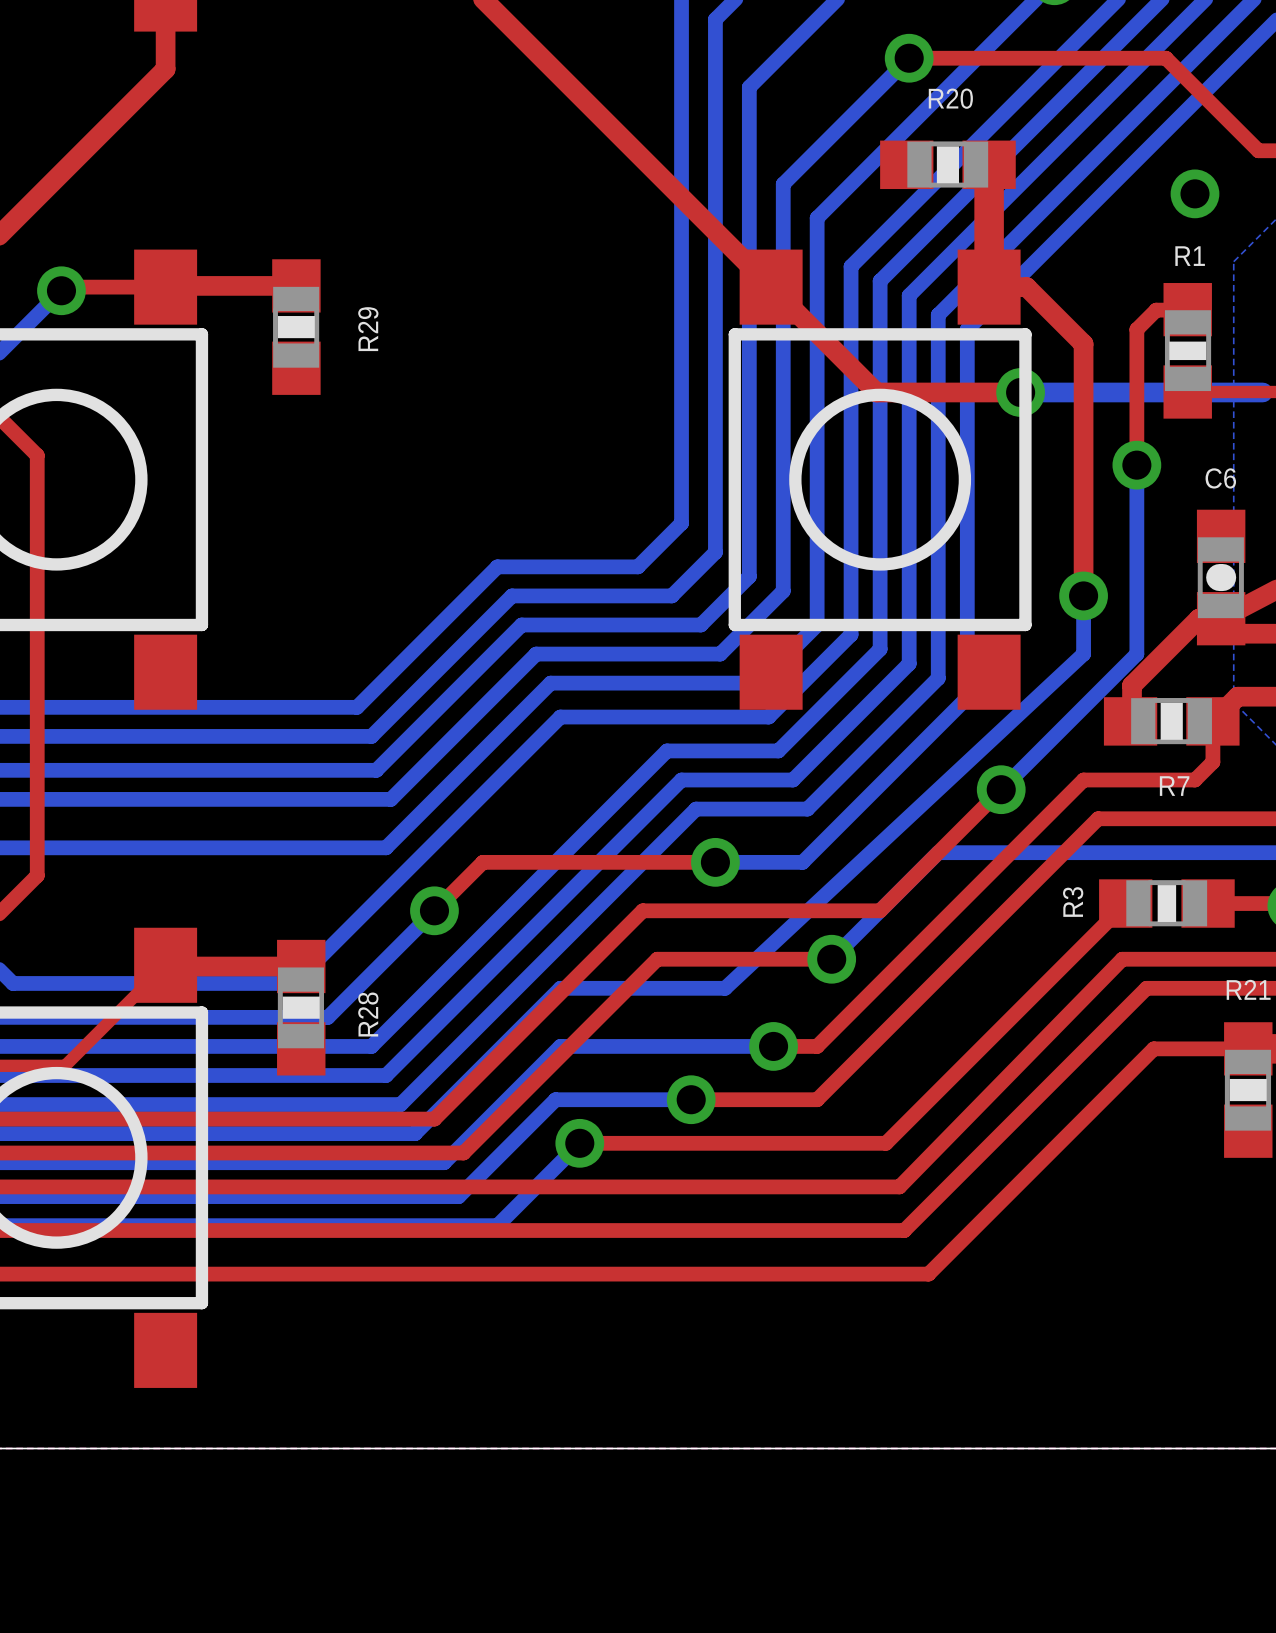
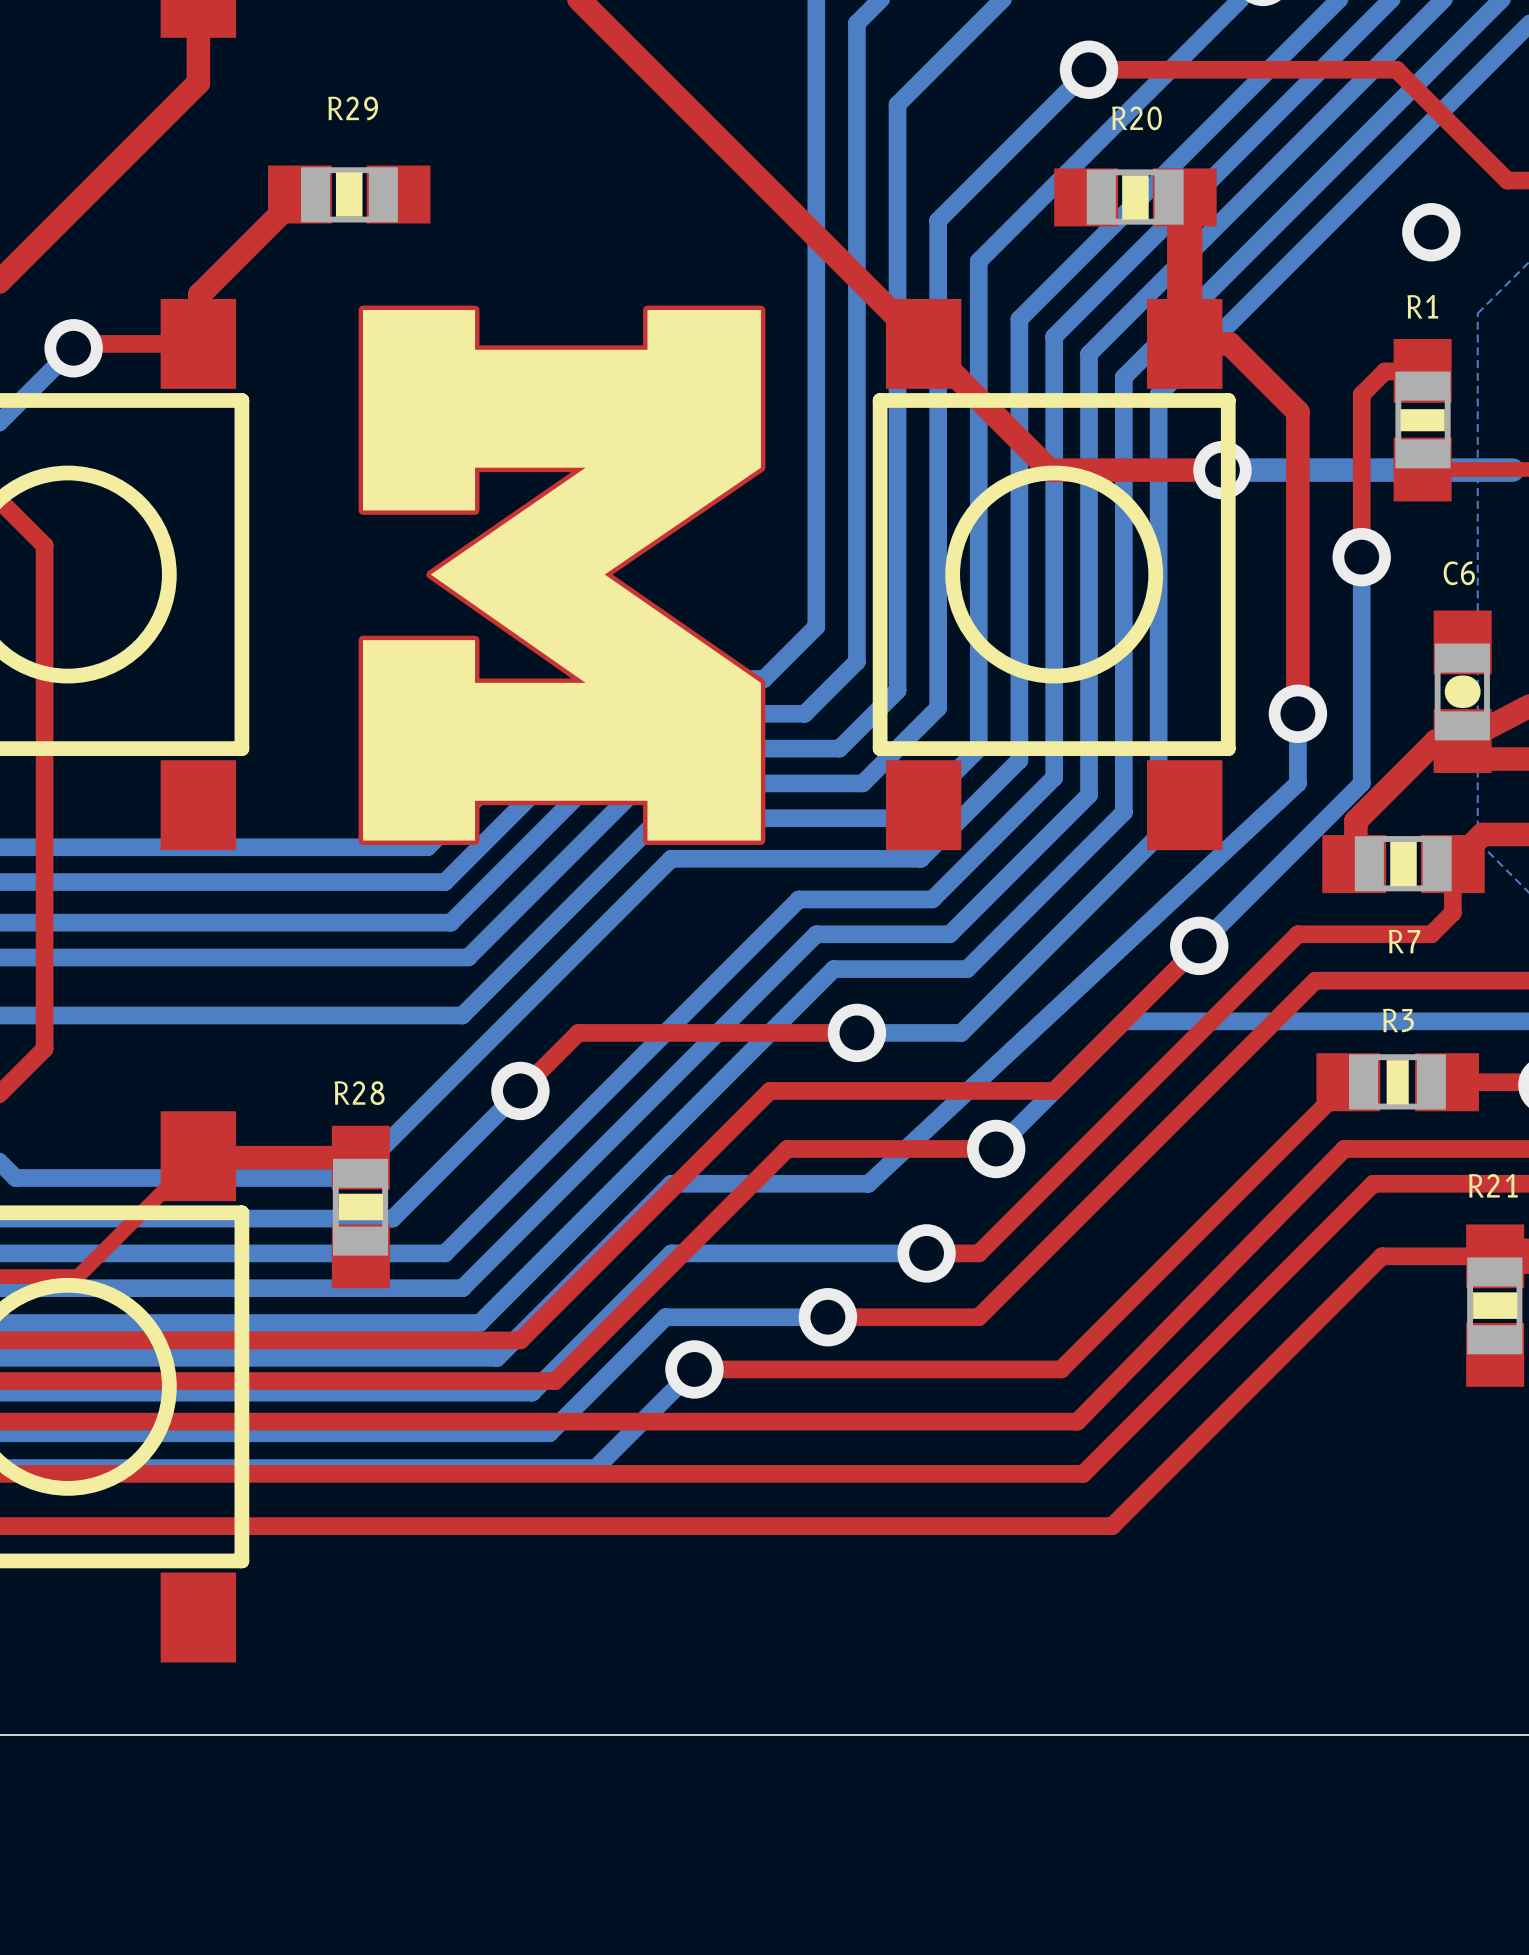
drawing: none -> [358, 305, 766, 845]
top track: (166, 285) (296, 285) -> (199, 342) (199, 294) (299, 194)
R29 rotation: 0° (296, 327) -> 90° clockwise (349, 194)
R29 position: (296, 327) -> (349, 194)
R29 name position: R29 (368, 329) -> R29 (353, 108)
R3 name rotation: 0° (1073, 902) -> 90° clockwise (1398, 1020)
R3 name position: R3 (1073, 902) -> R3 (1398, 1020)
R28 name rotation: 0° (368, 1014) -> 90° clockwise (359, 1093)
R28 name position: R28 (368, 1014) -> R28 (359, 1093)

